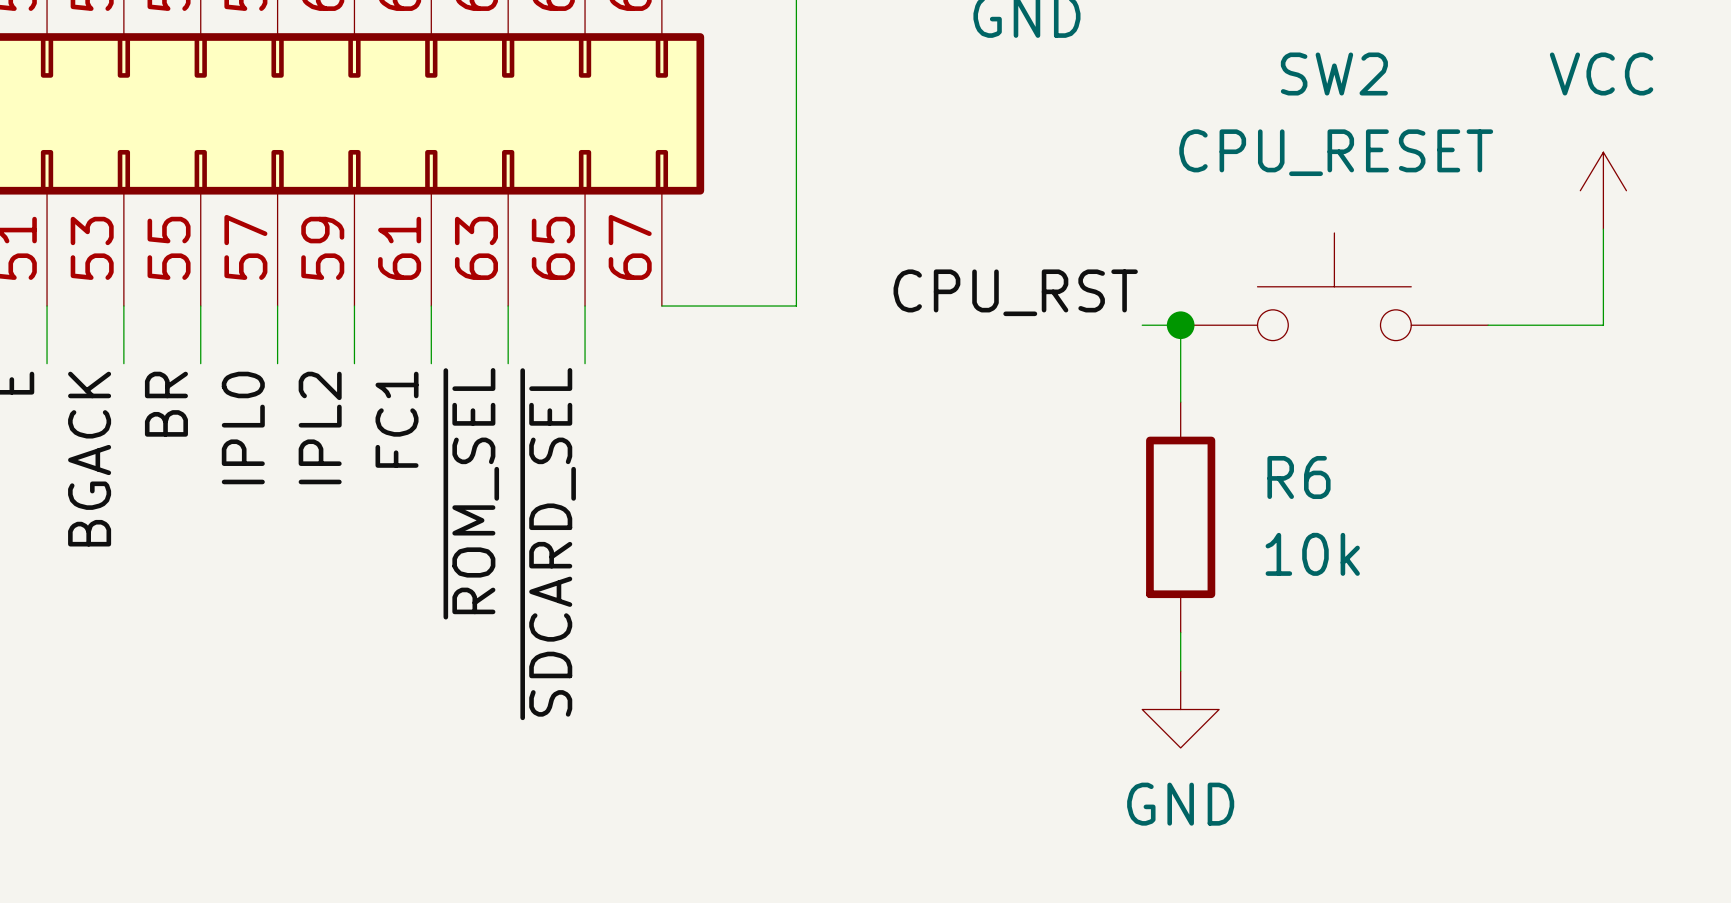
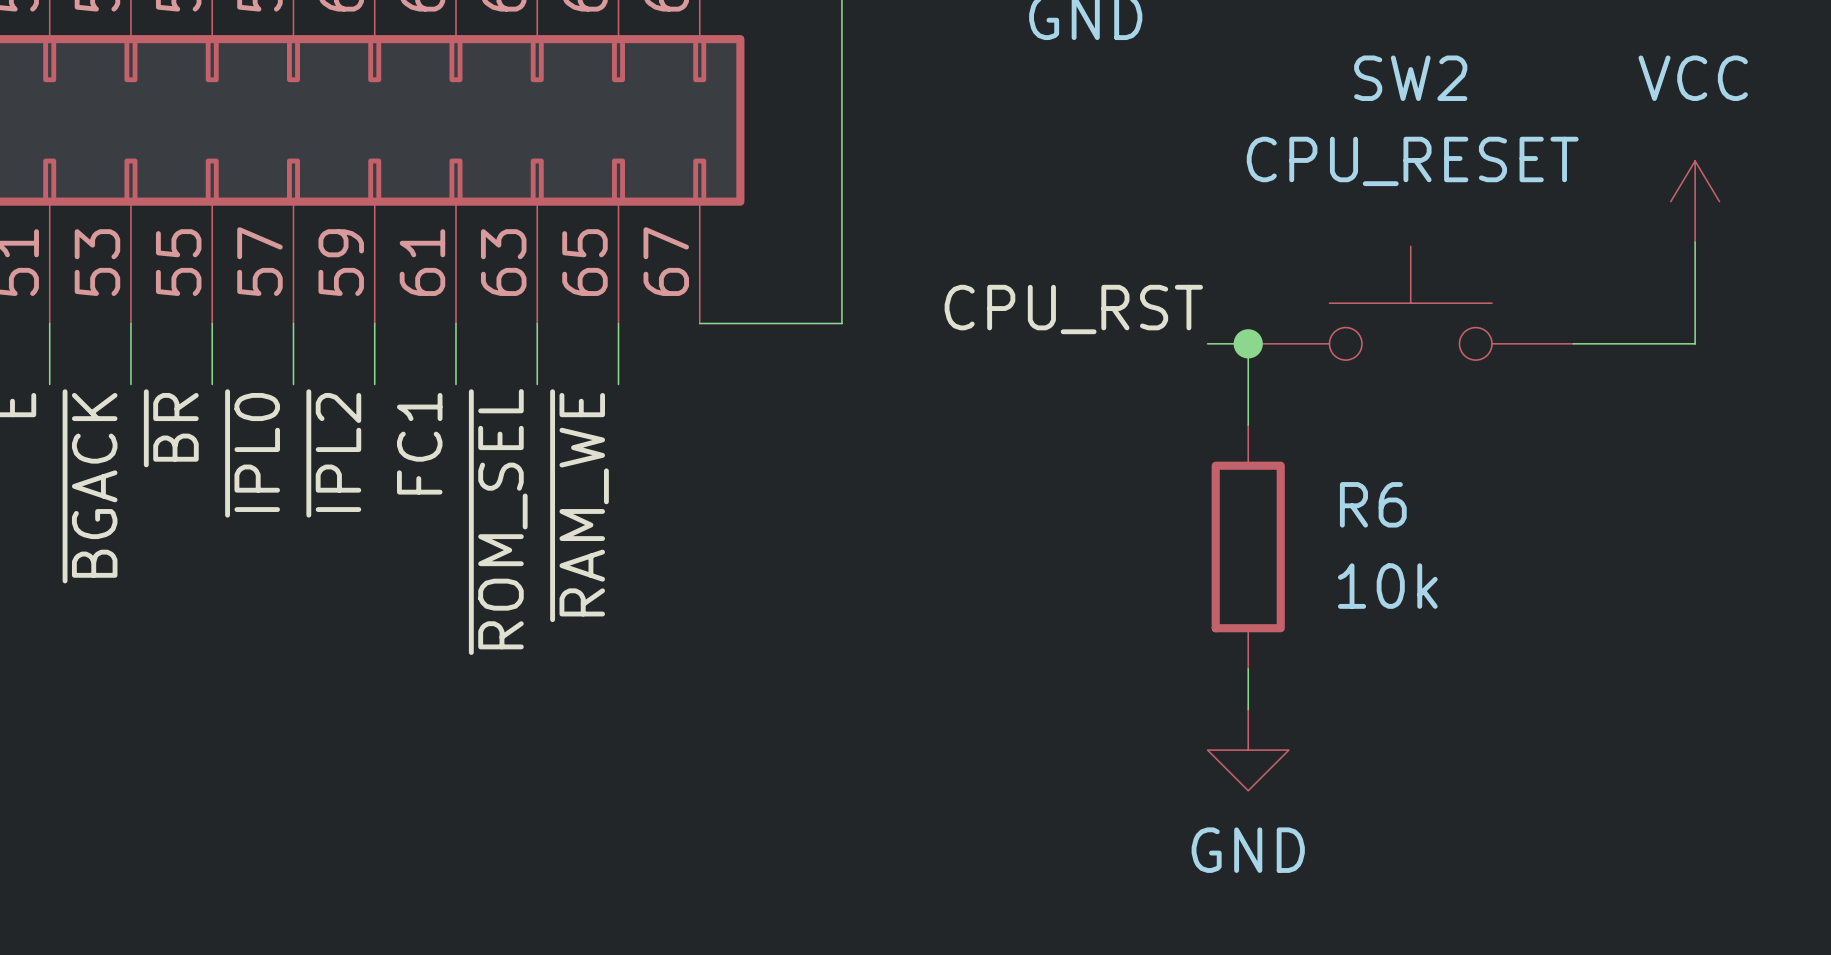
label: BR (166, 404) -> ~{BR} (171, 428)
label: IPL0 (243, 427) -> ~{IPL0} (252, 453)
label: IPL2 (320, 427) -> ~{IPL2} (333, 453)
label: BGACK (89, 459) -> ~{BGACK} (90, 486)
label: ~{SDCARD_SEL} (548, 544) -> ~{RAM_WE} (579, 505)

